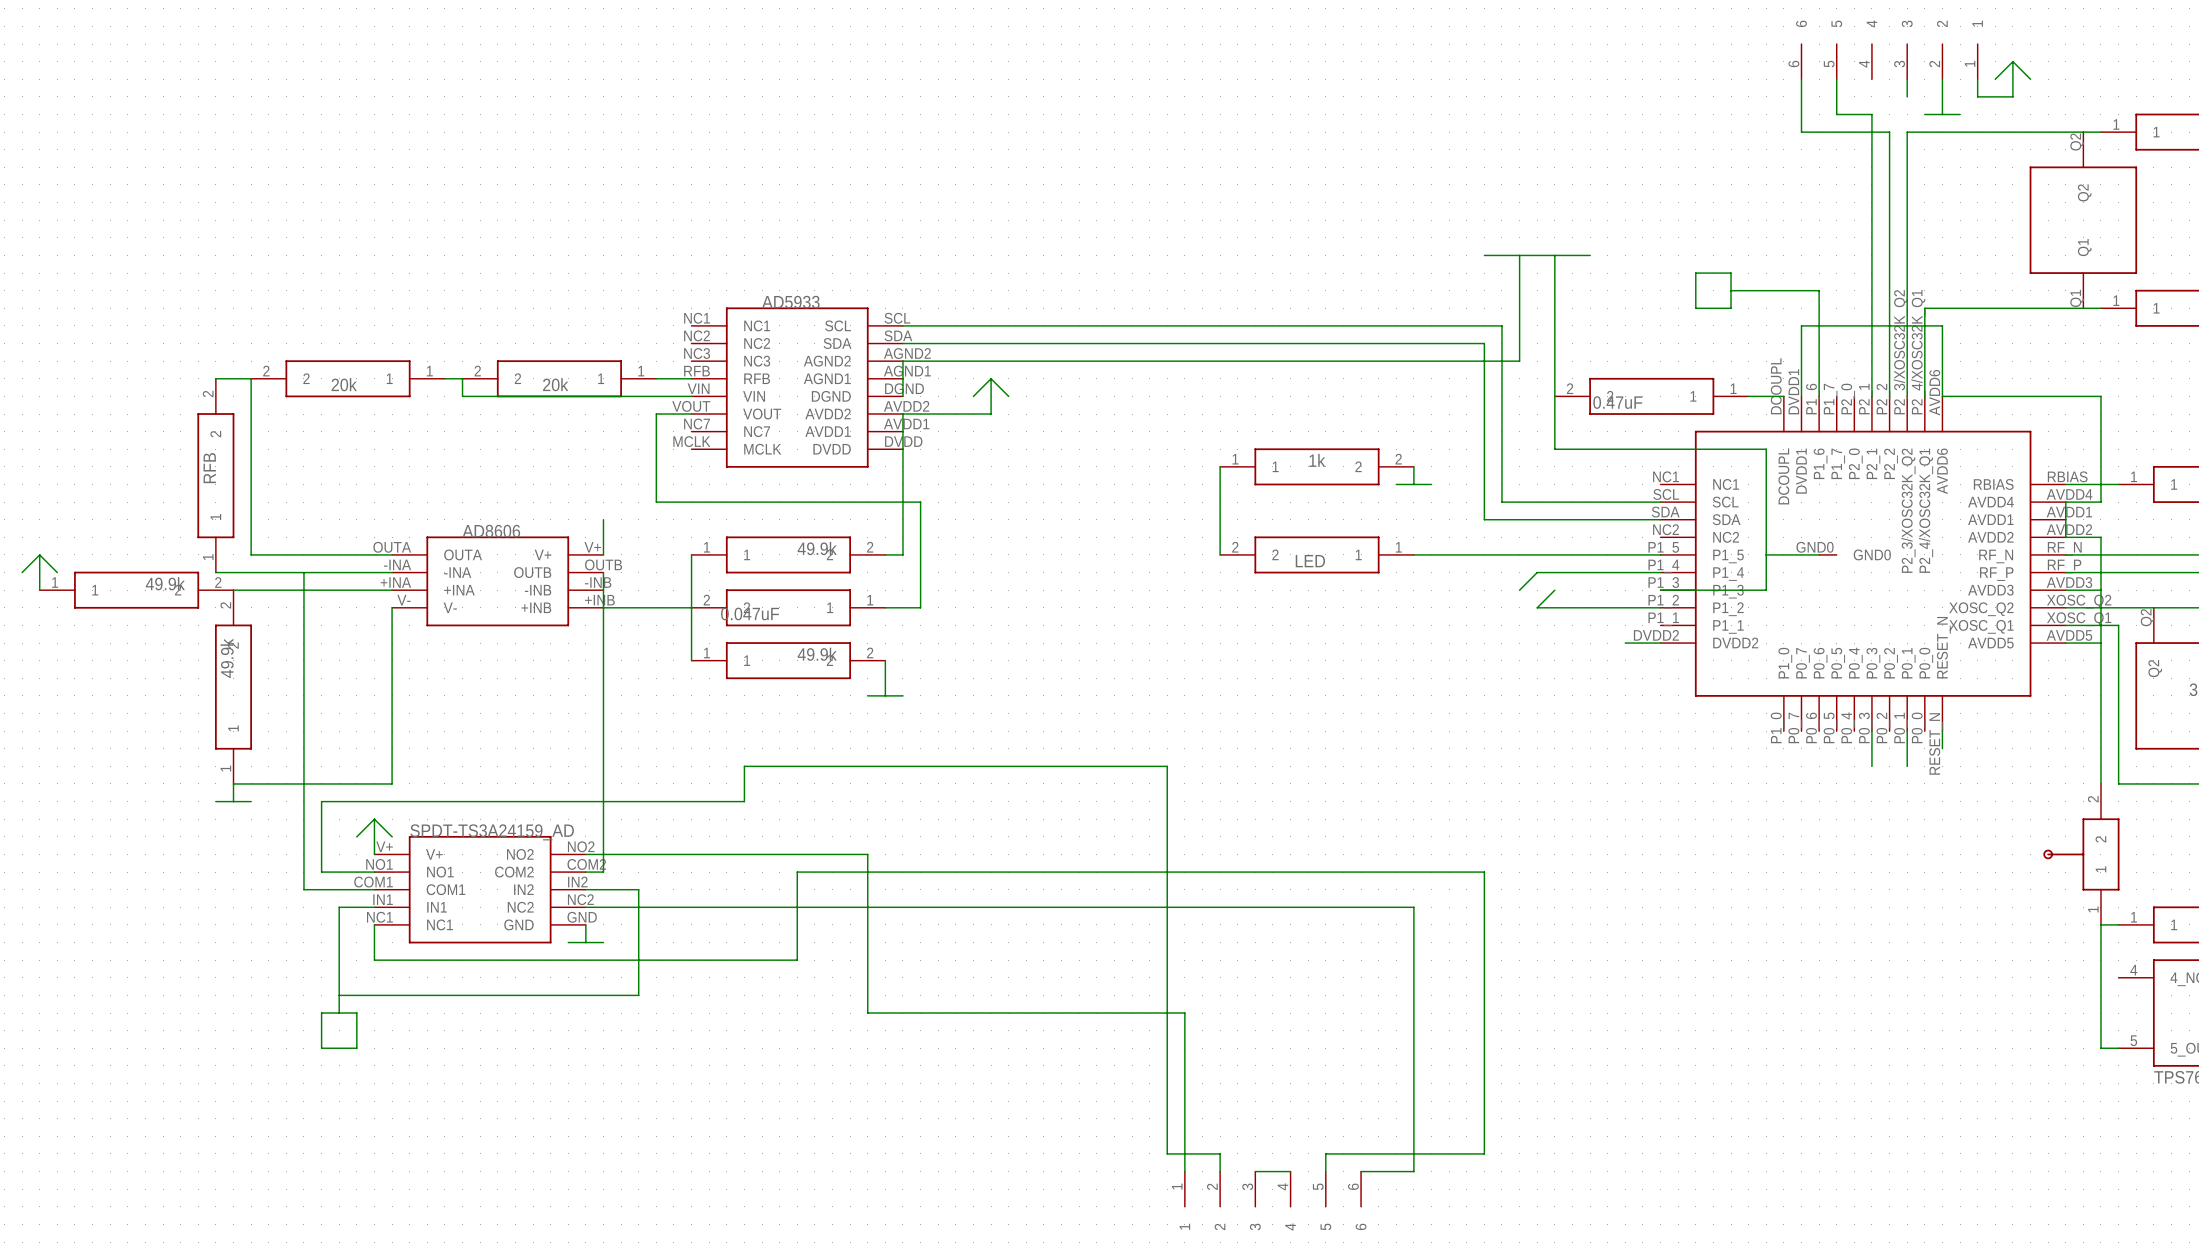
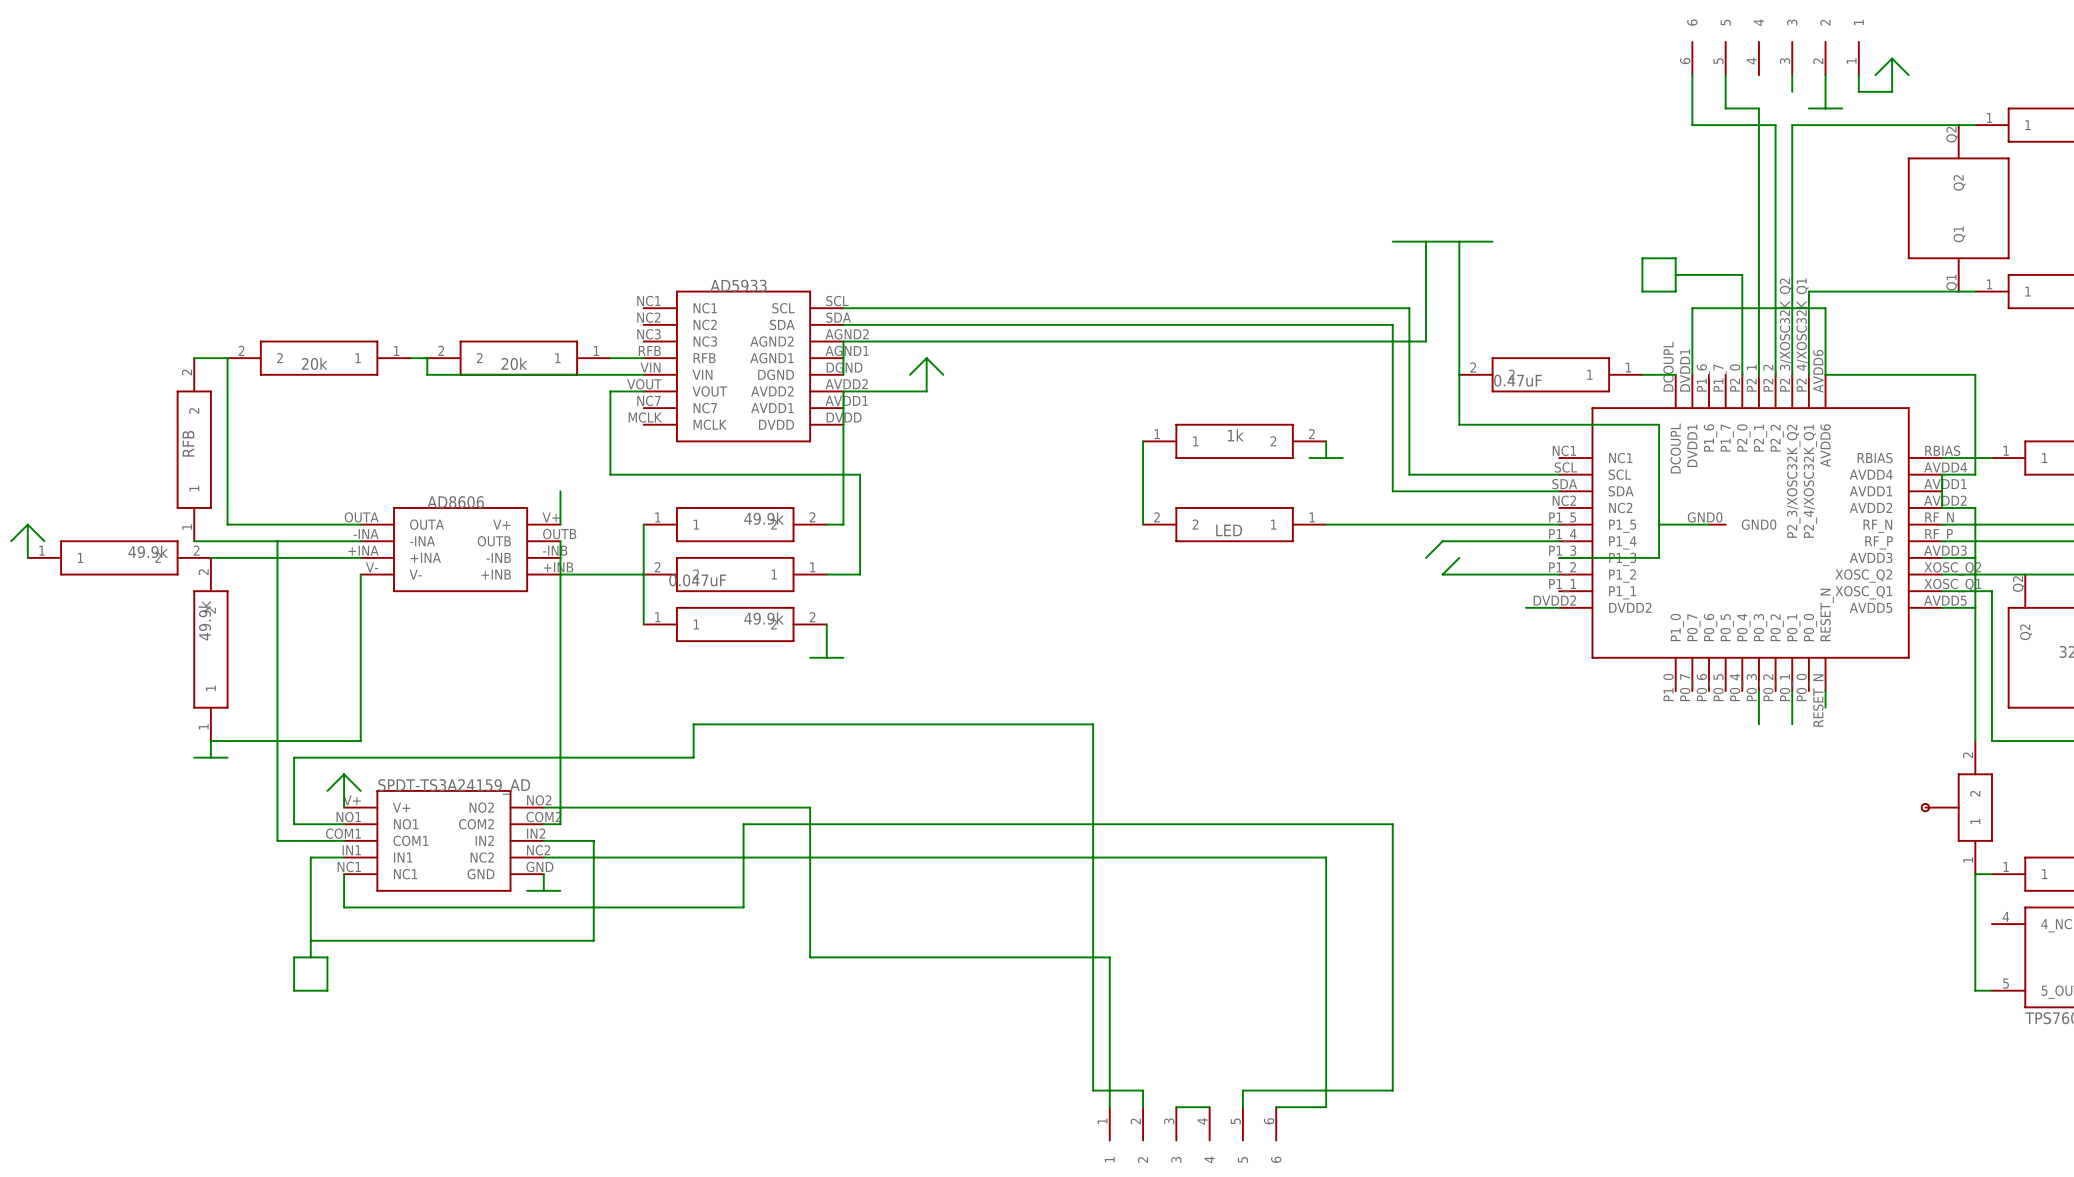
wire: (1695, 273) (1731, 273) (1731, 308) (1695, 308) (1695, 273) -> (1642, 258) (1675, 258) (1675, 291) (1642, 291) (1642, 258)
wire: (1731, 290) (1783, 290) -> none
wire: (1819, 290) (1819, 396) -> (1709, 274) (1742, 274) (1742, 374)

